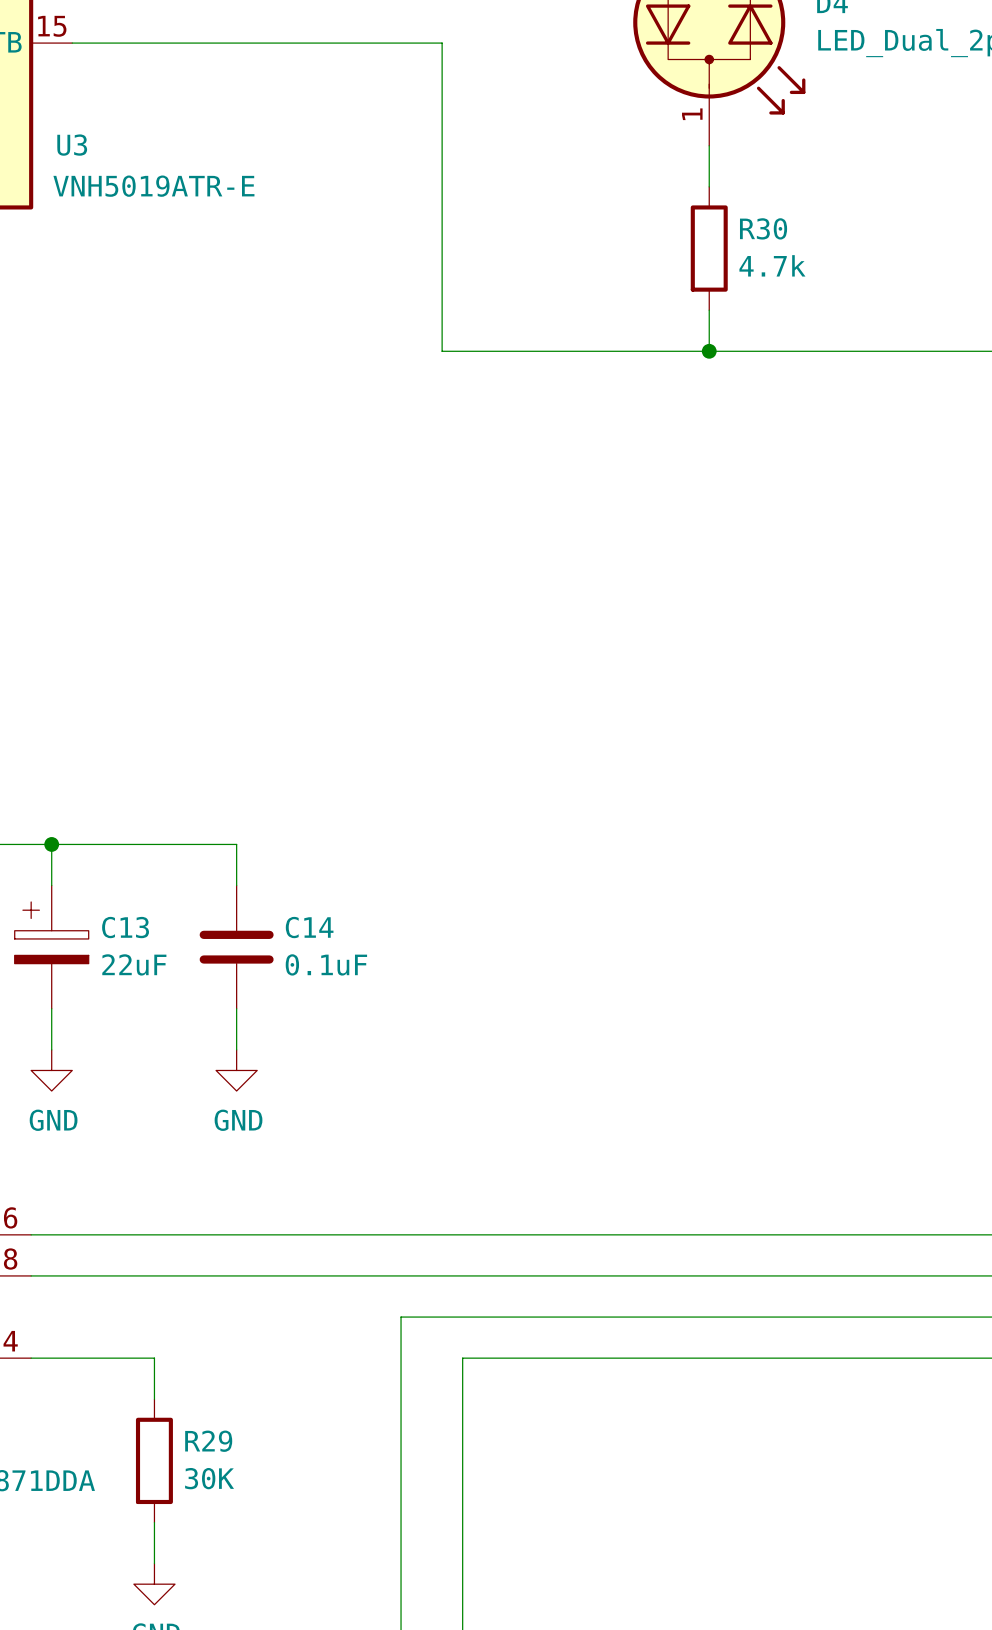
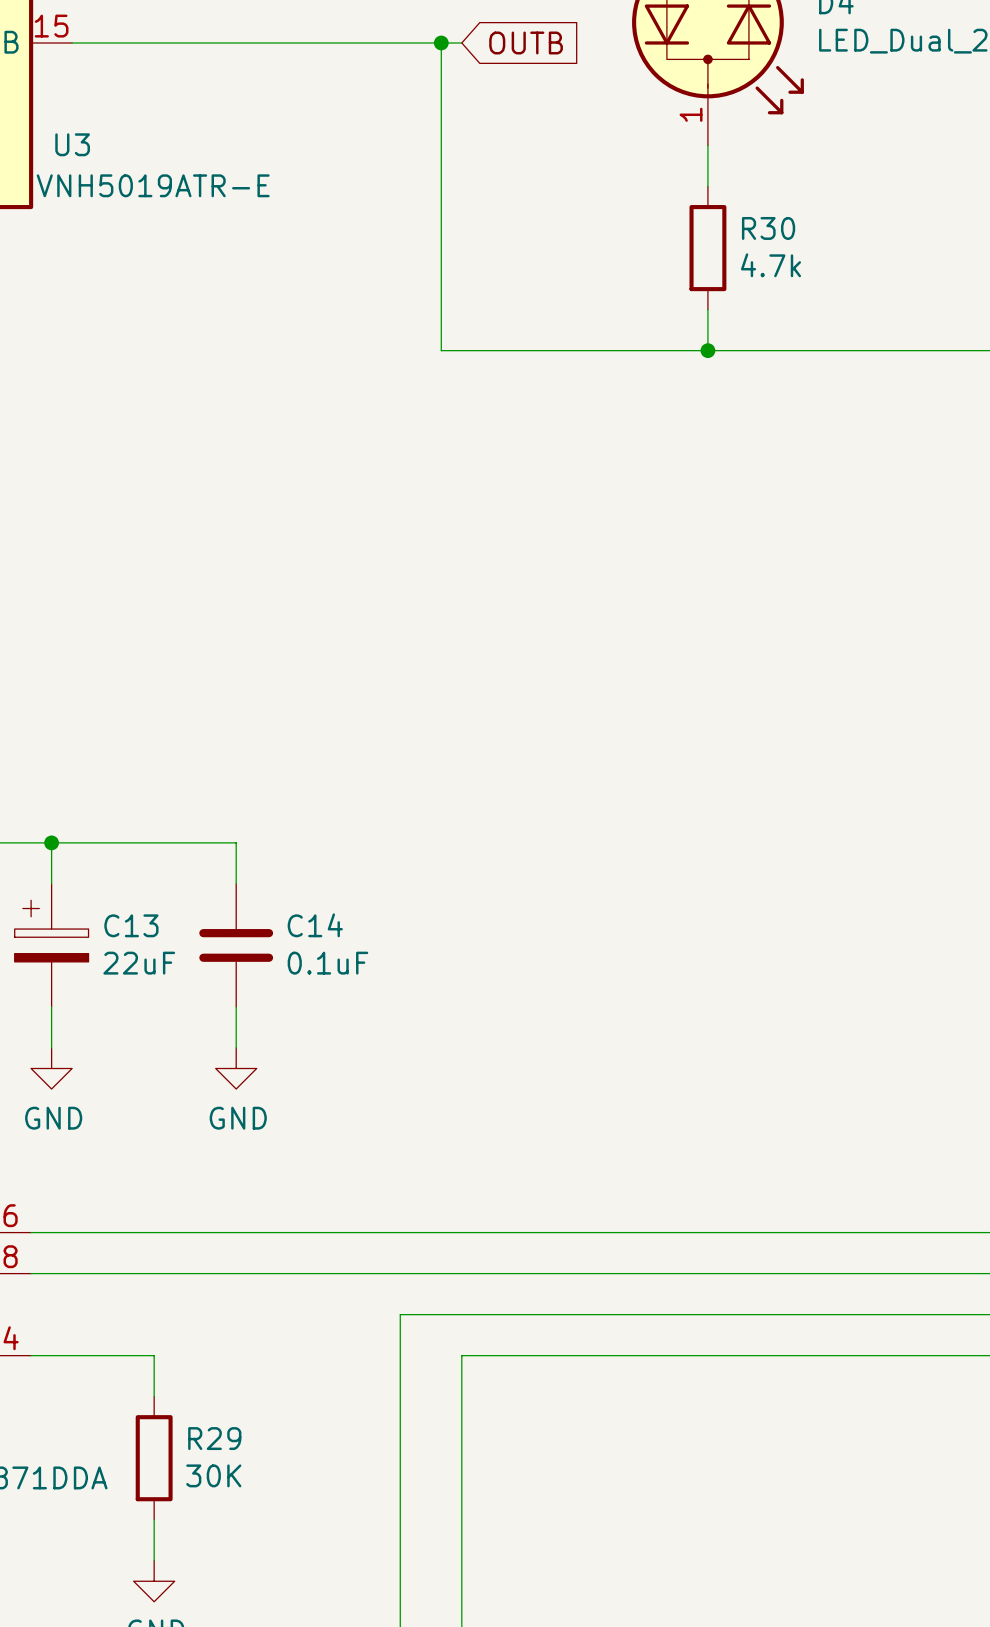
wire: none -> (441, 42) (461, 42)
junction: none -> (441, 42)
global label: none -> OUTB (526, 42)

